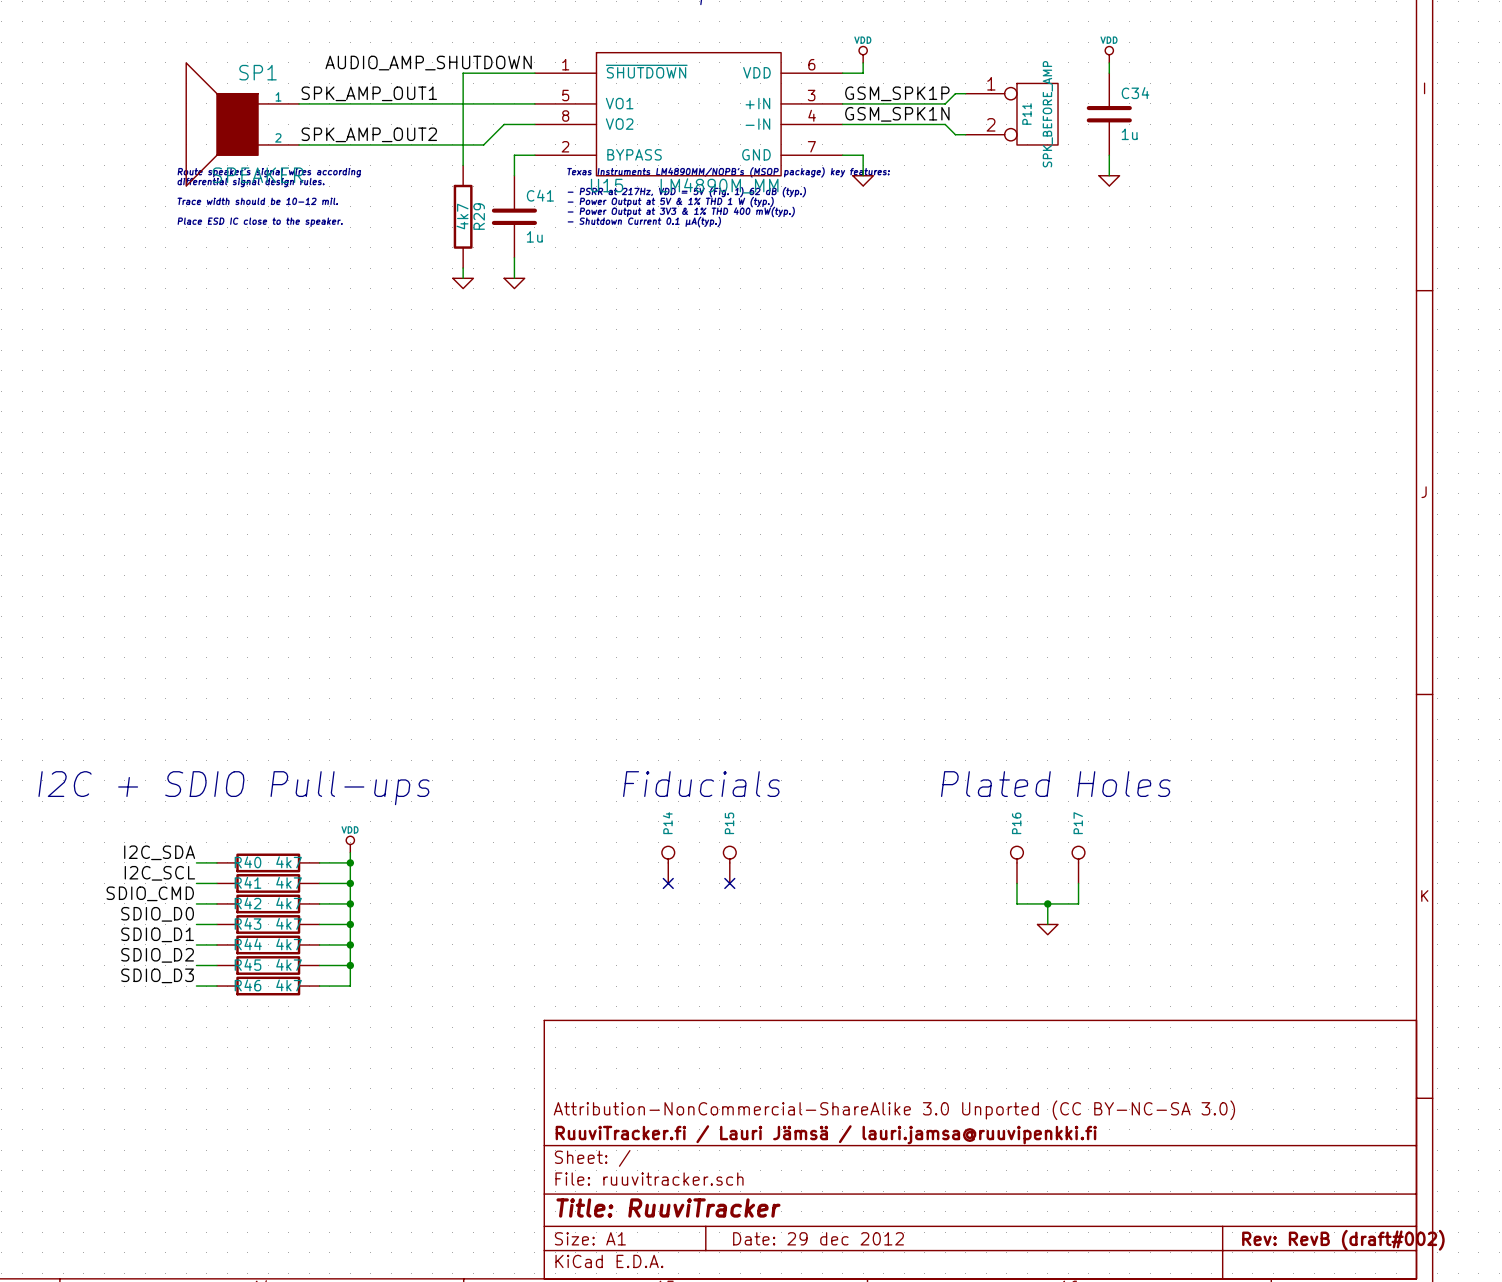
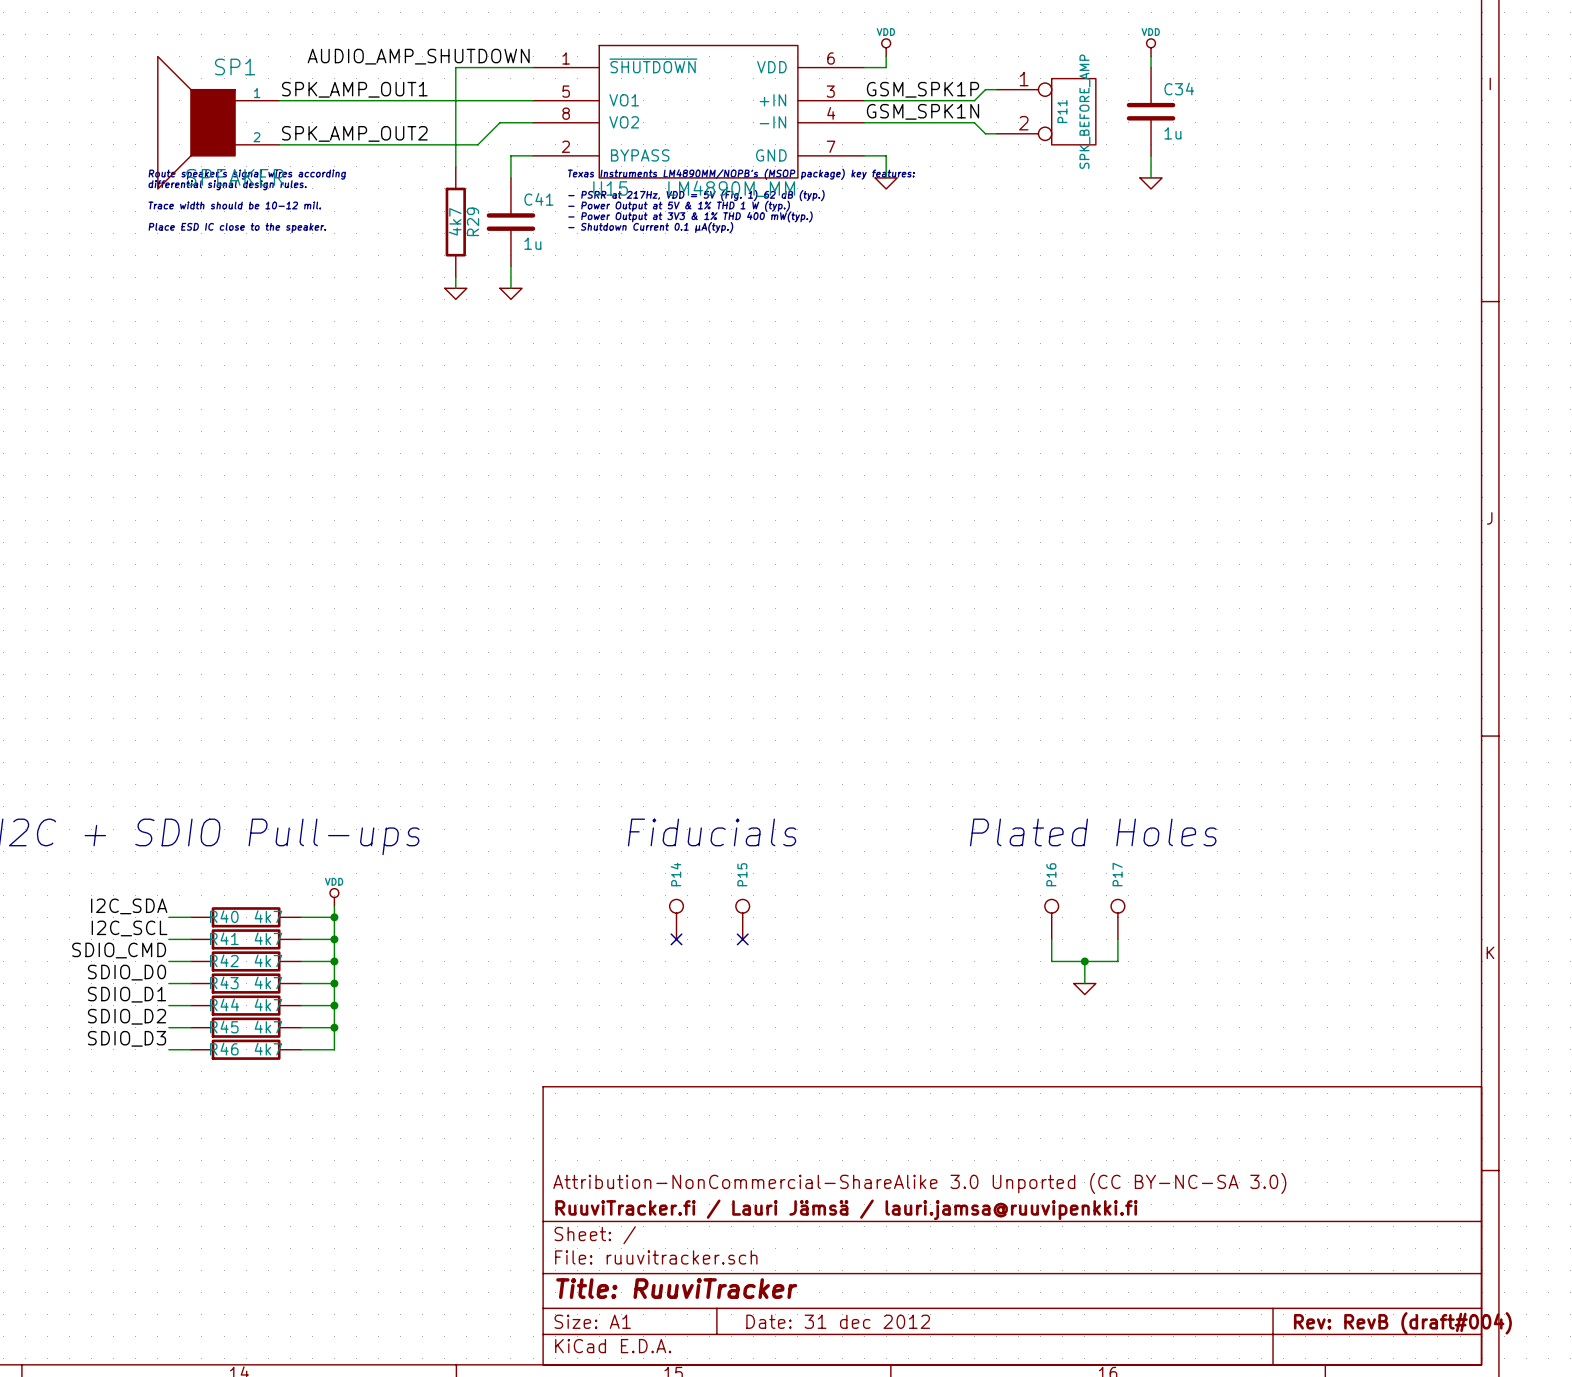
title block: Date: 29 dec 2012 (818, 1238) -> Date: 31 dec 2012 (838, 1321)
title block: Rev: RevB (draft#002) (1343, 1240) -> Rev: RevB (draft#004) (1402, 1323)

